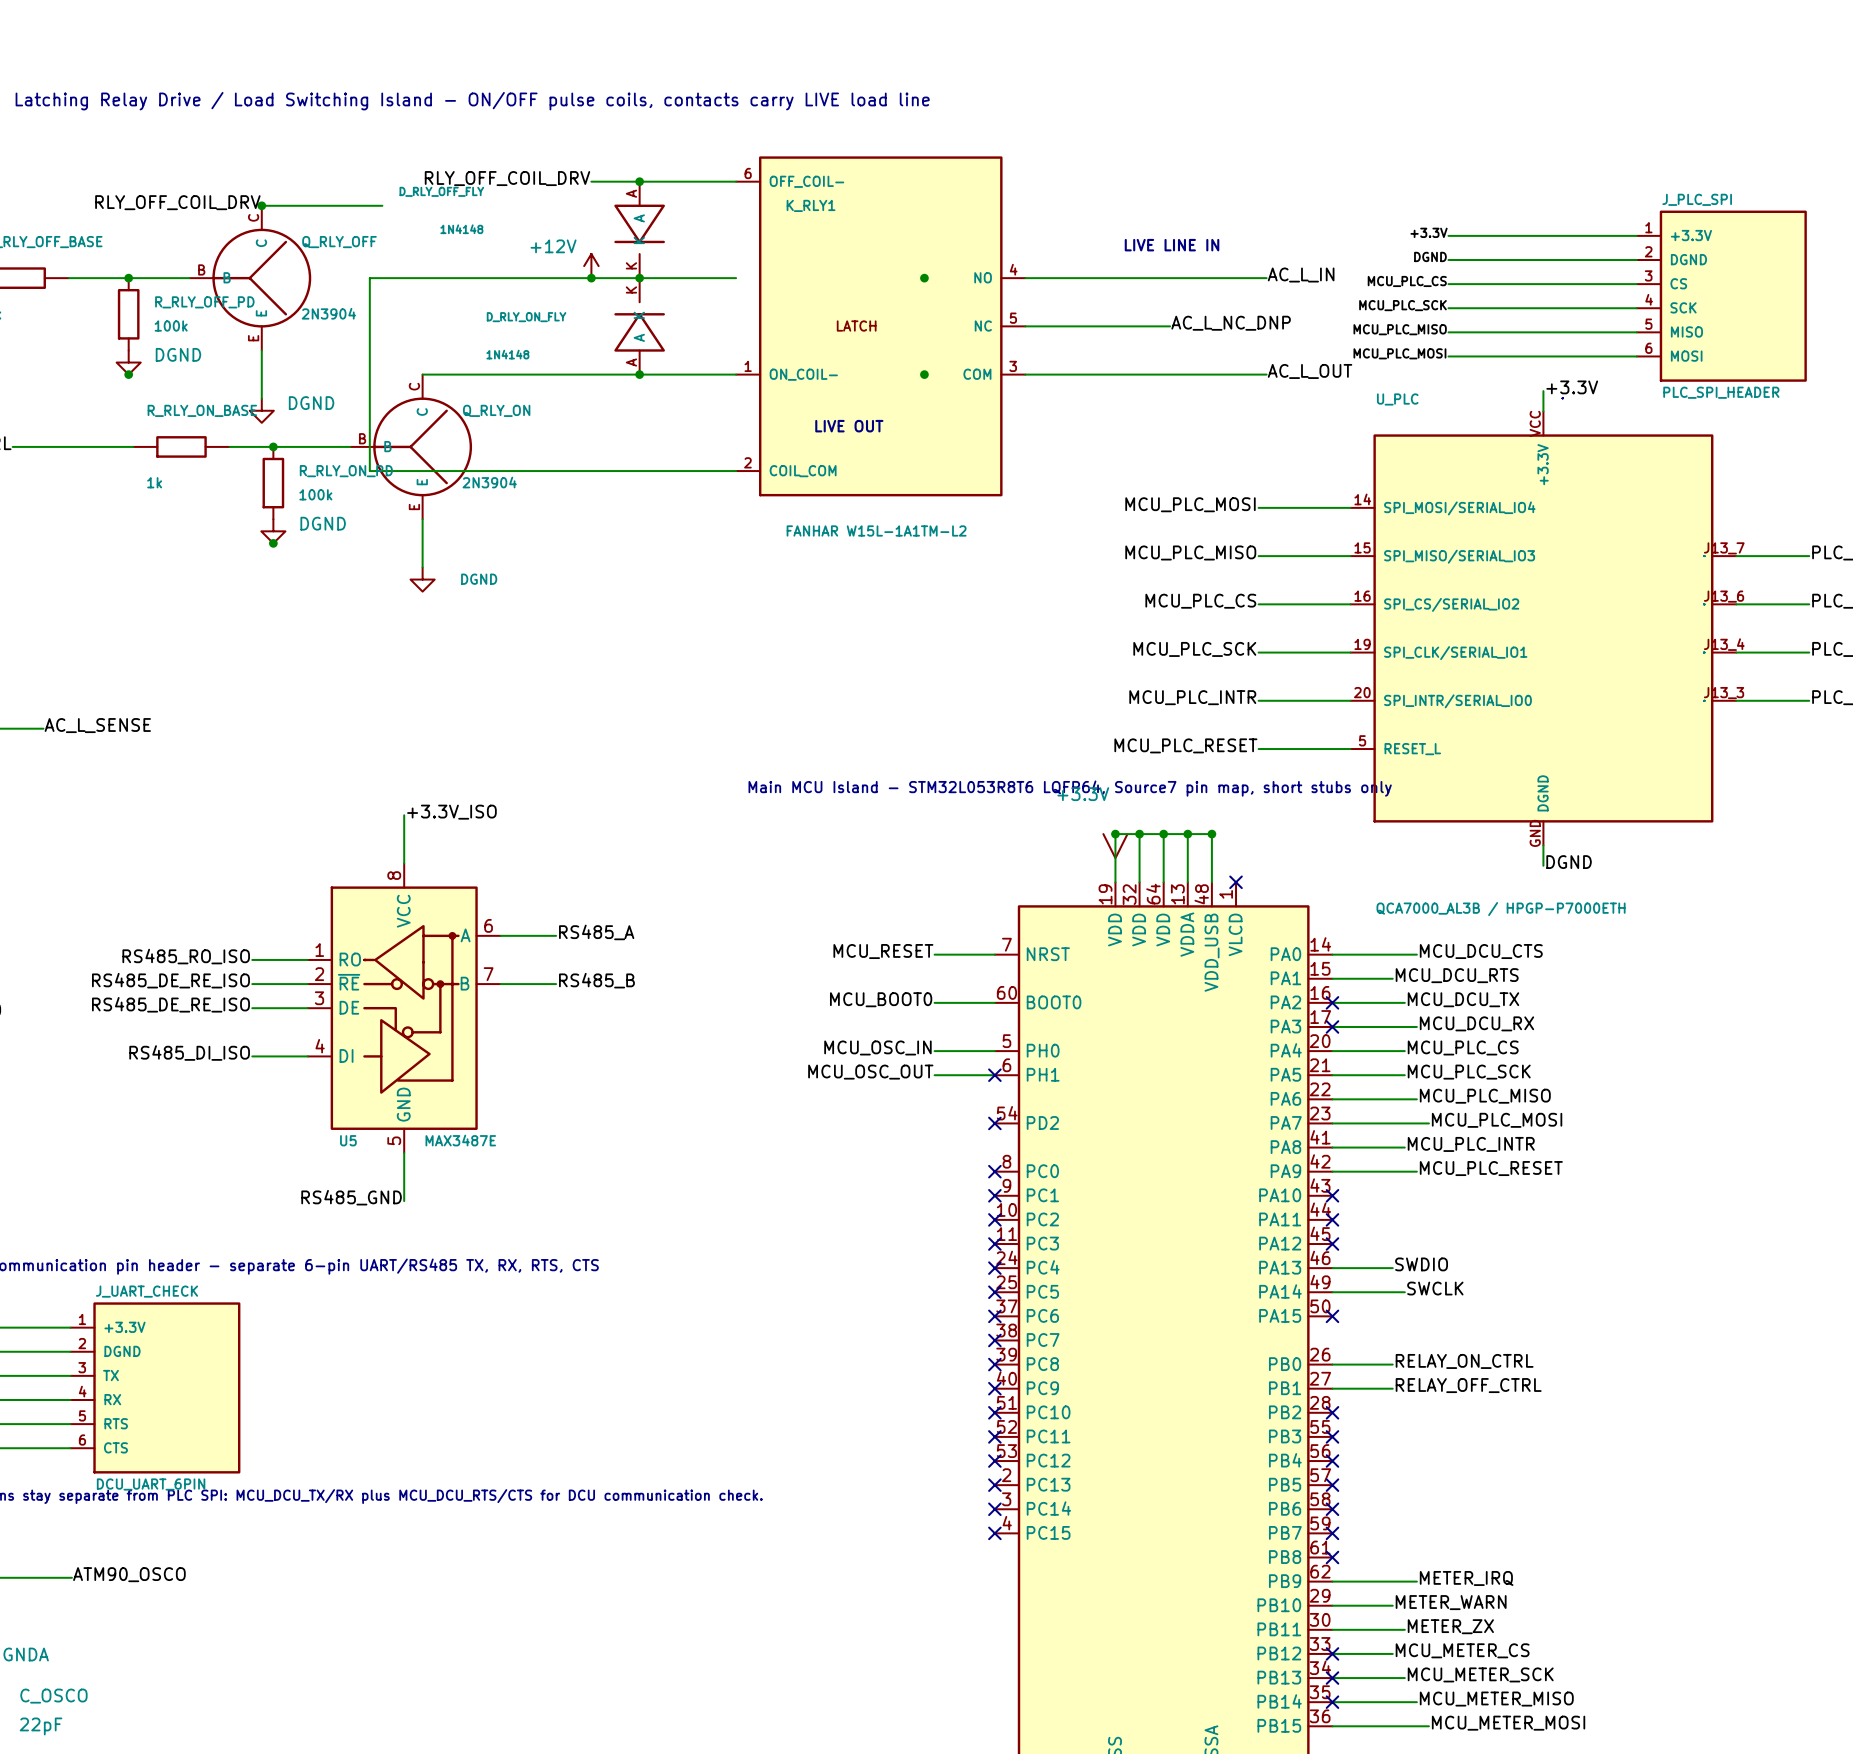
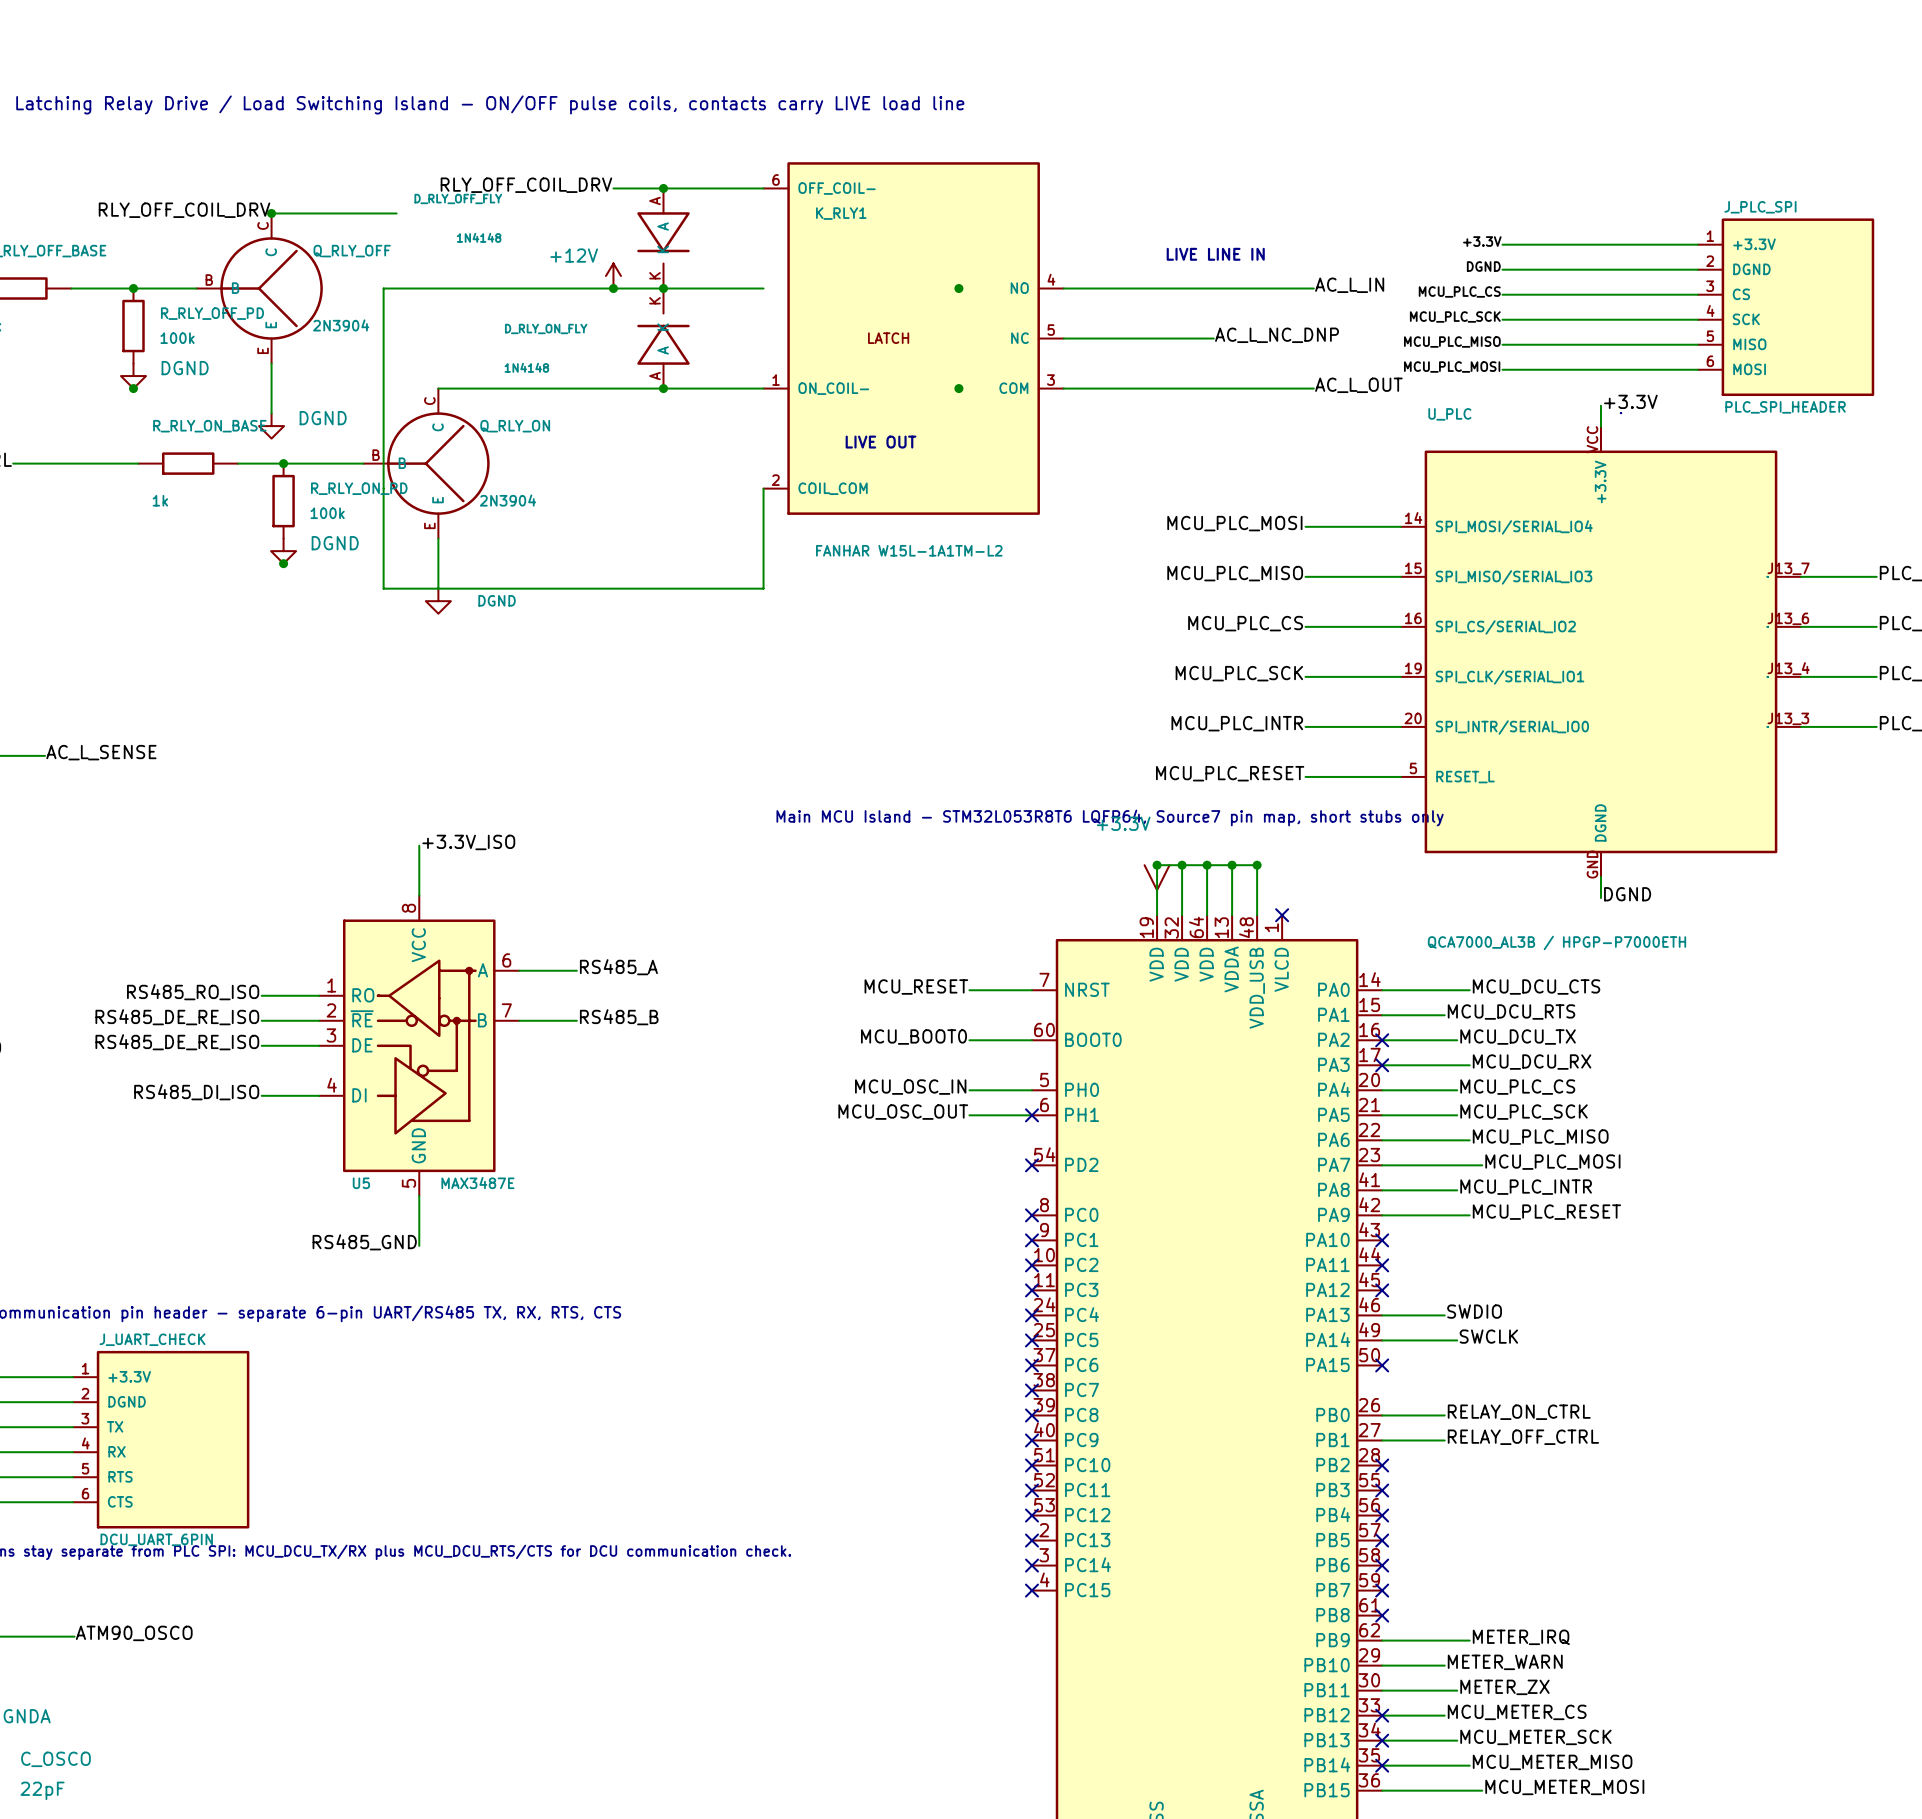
wire: (369, 471) (736, 471) -> (383, 488) (383, 588) (763, 588) (763, 488)

